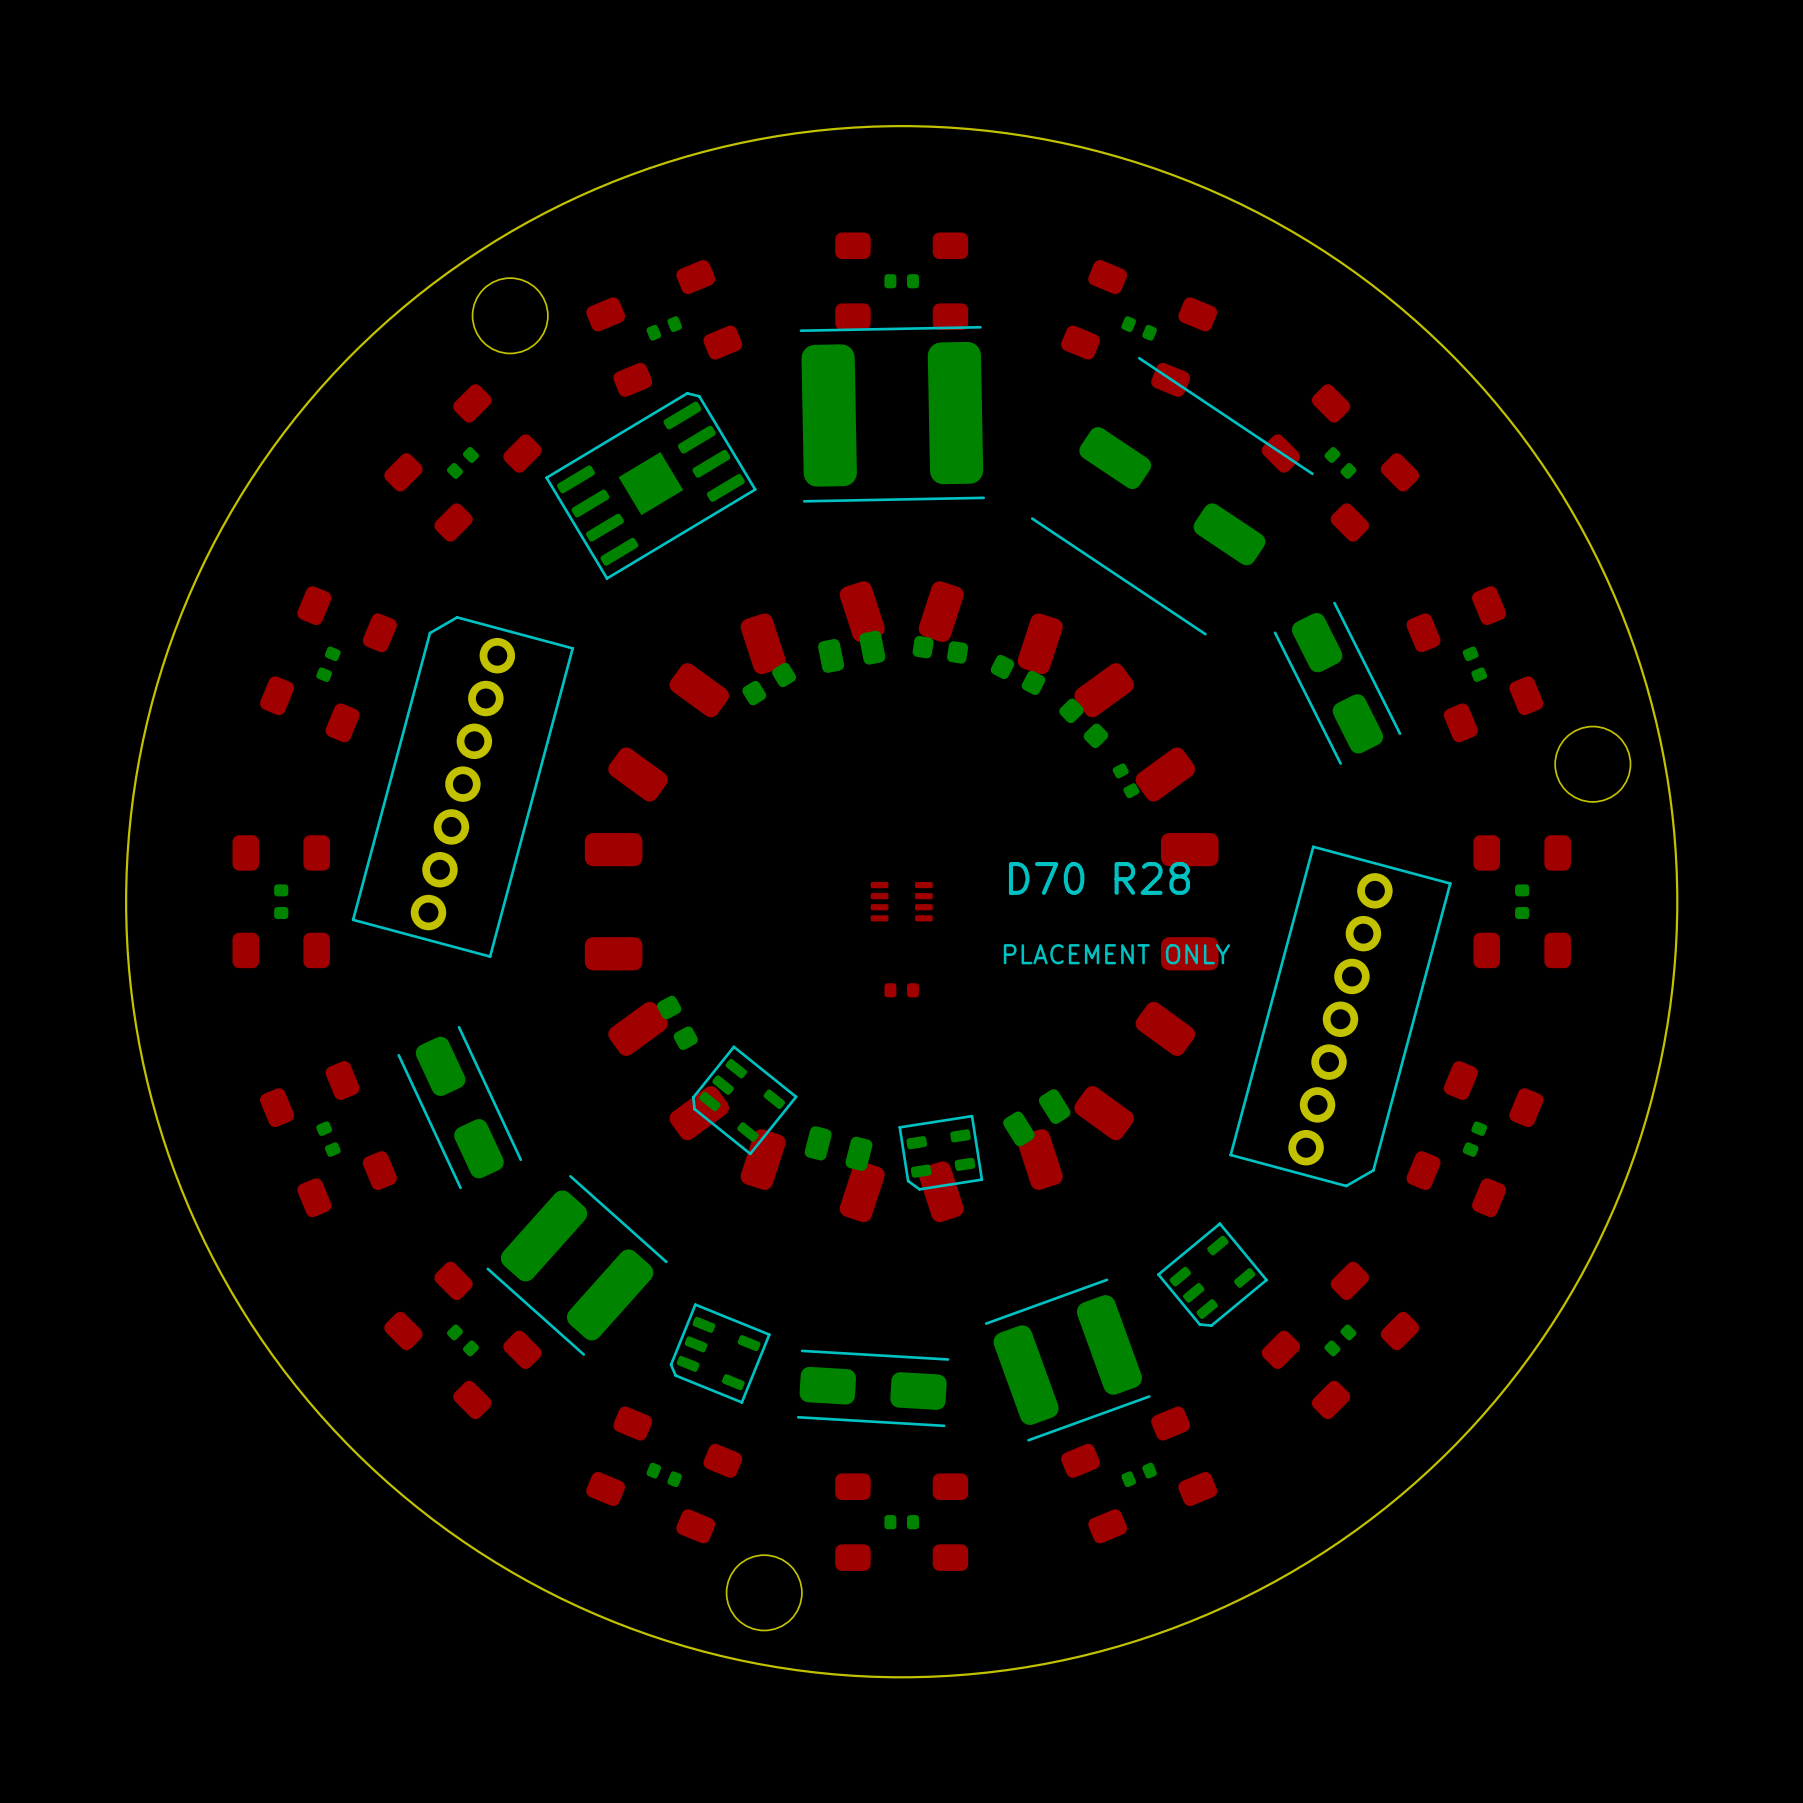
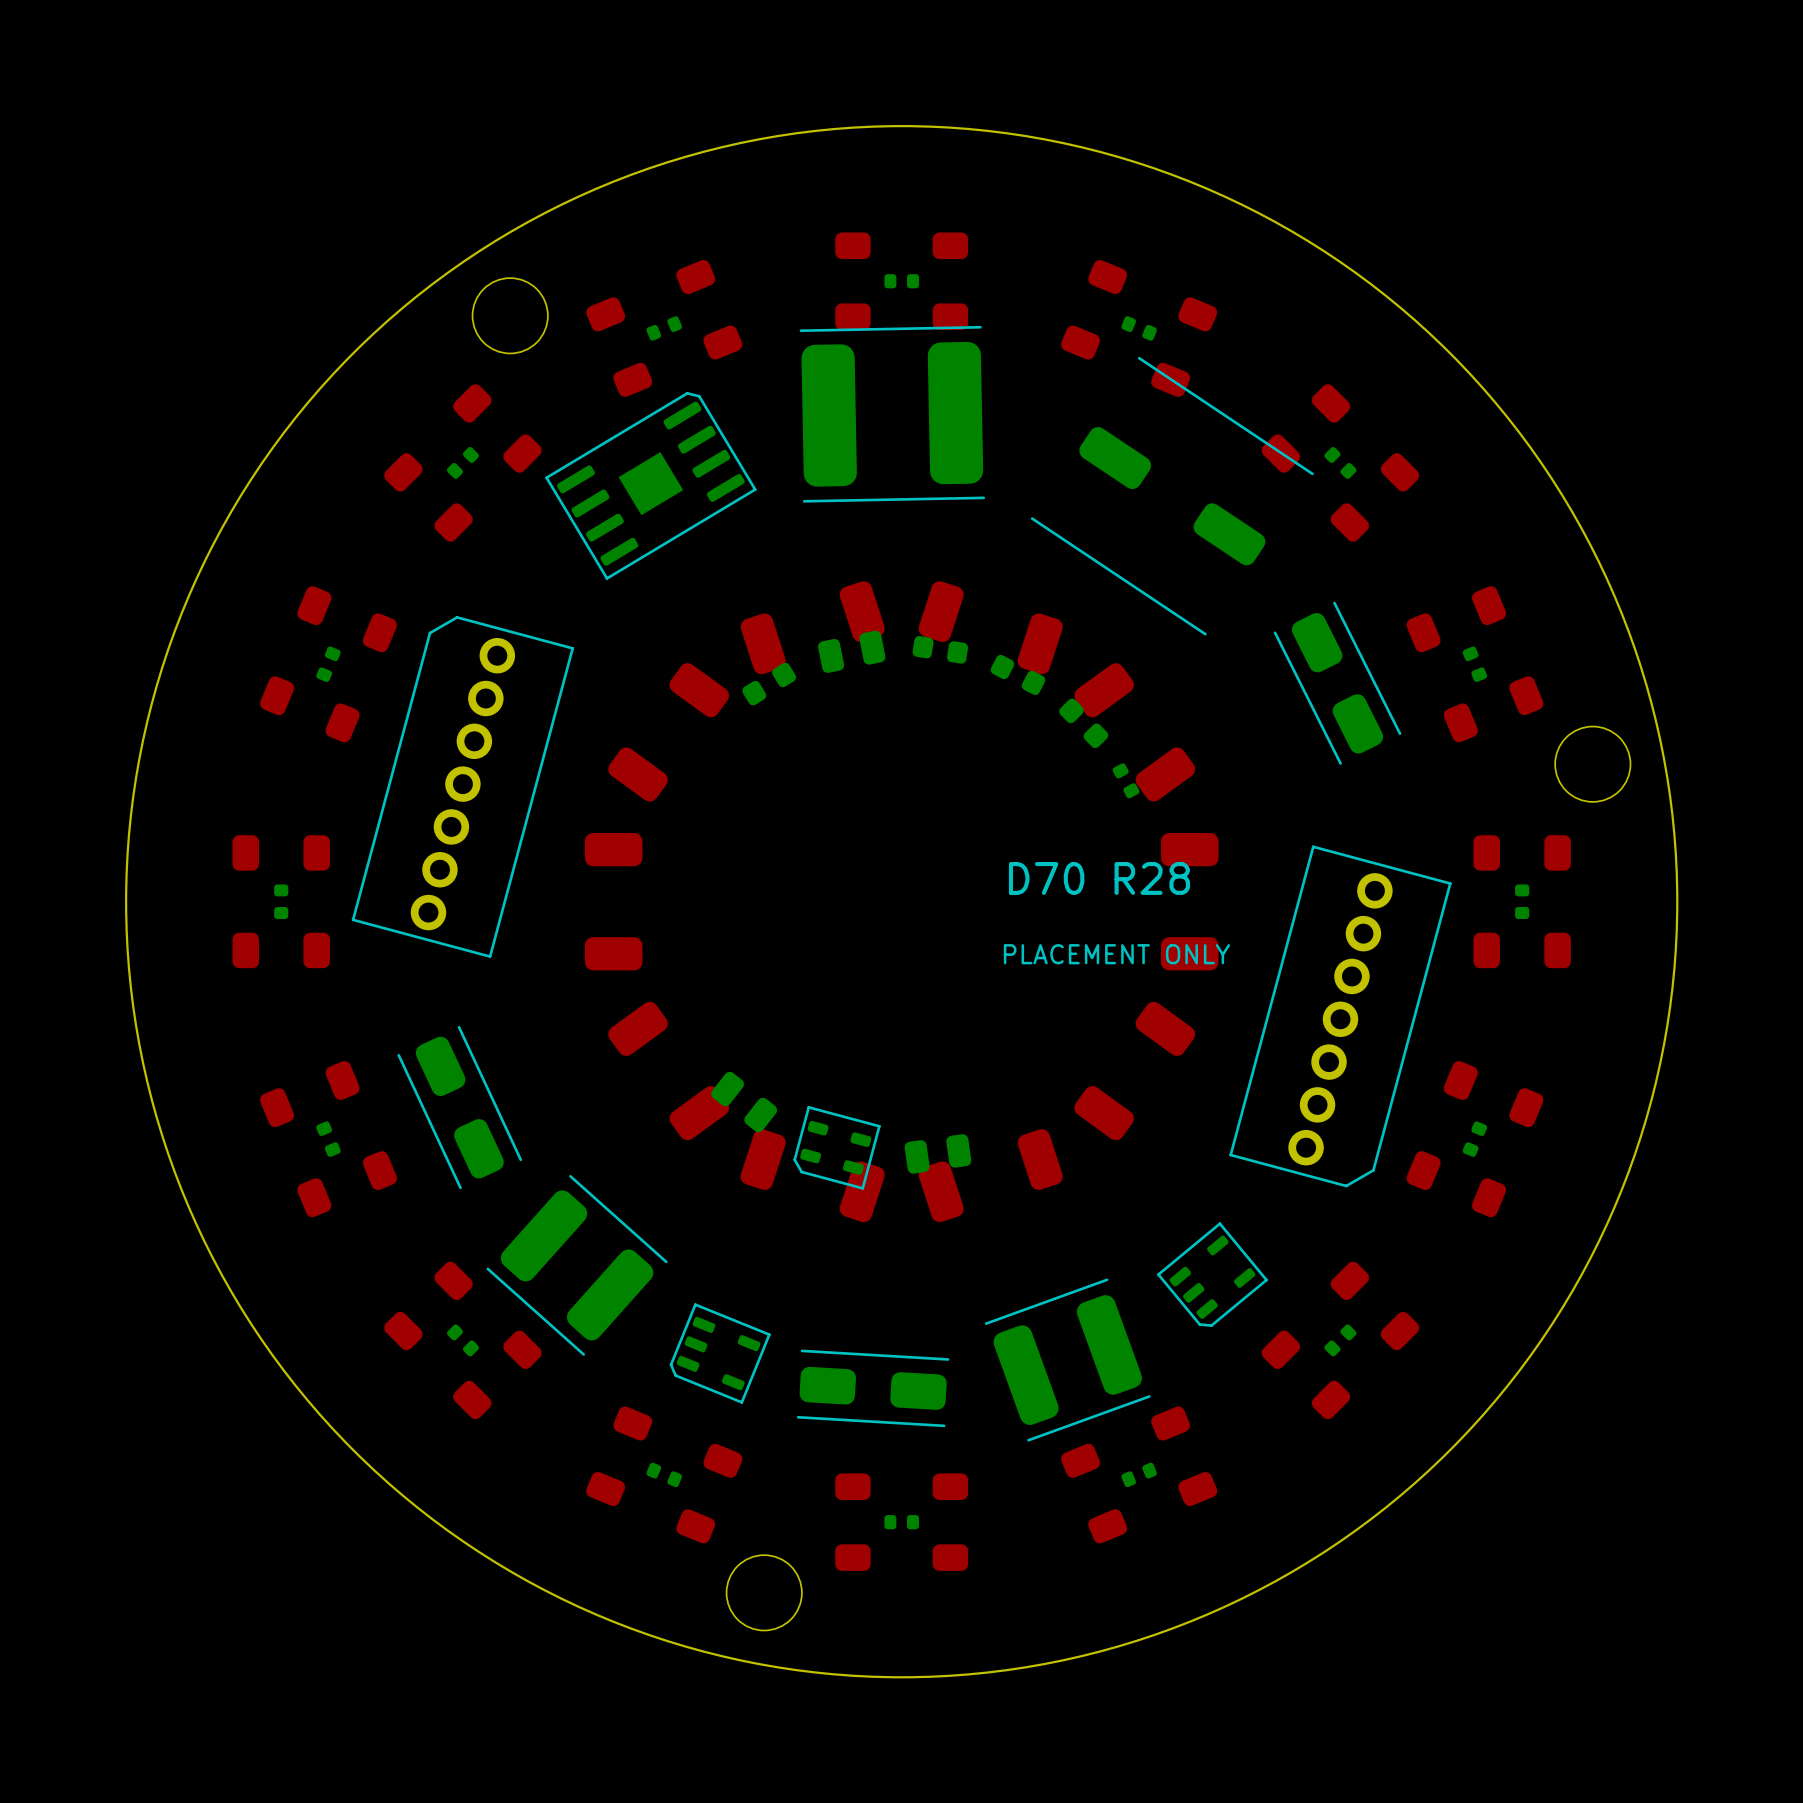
part: (901, 901) -> none
part: (901, 990) -> none
part: (677, 1022) -> none
part footprint: [691, 1045, 798, 1156] -> [711, 1071, 778, 1133]
part footprint: [898, 1114, 984, 1191] -> [904, 1134, 972, 1174]
part: (1036, 1117) -> none
part footprint: [804, 1126, 873, 1171] -> [793, 1106, 881, 1190]

